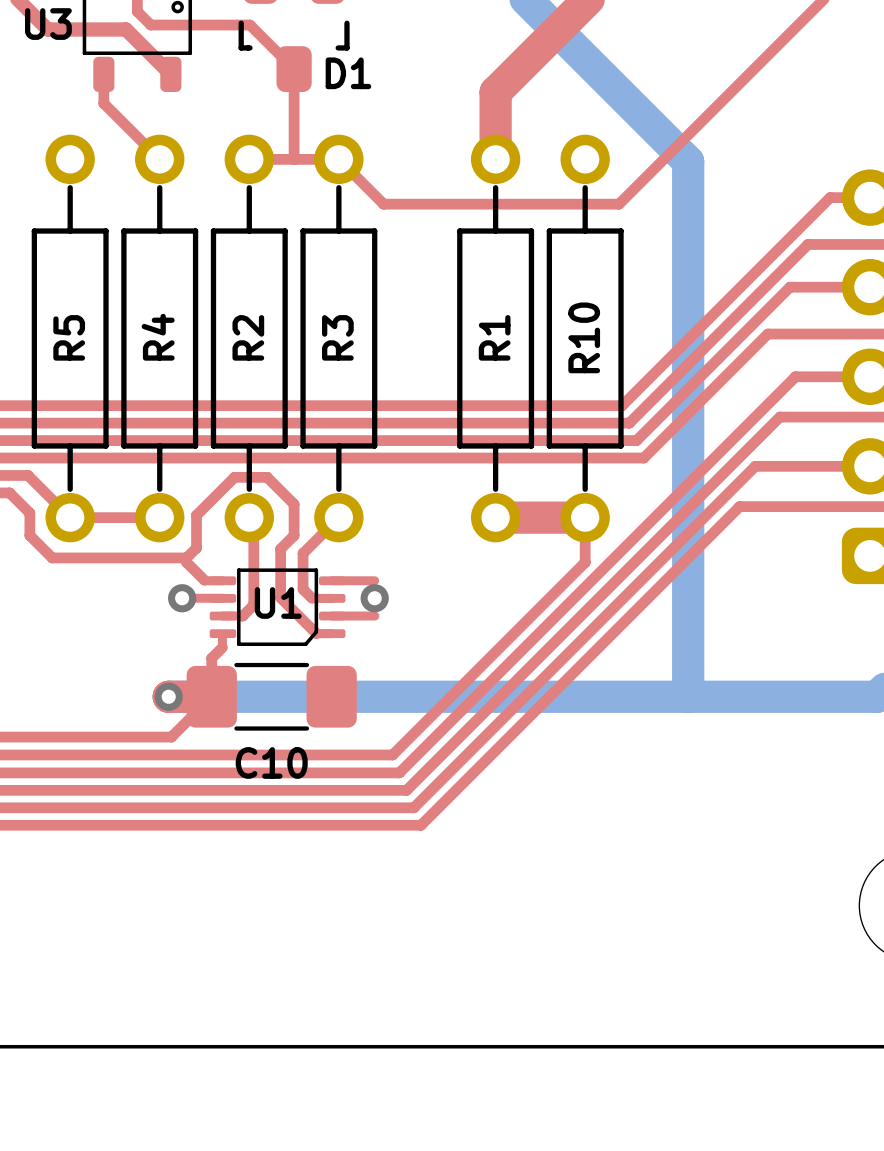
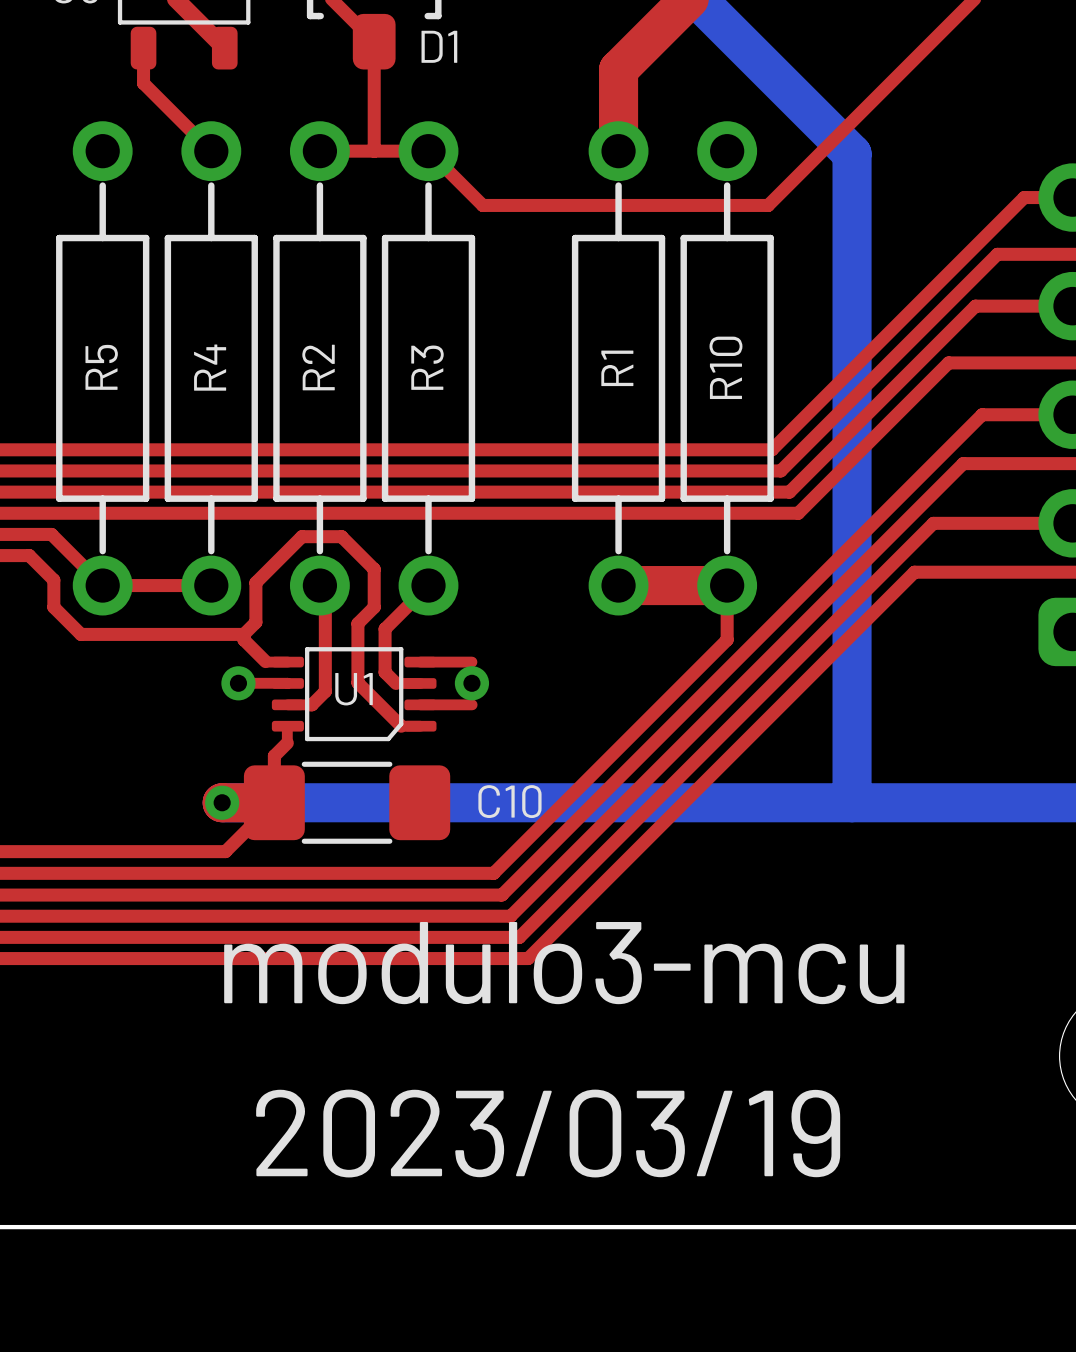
C10 name position: C10 (271, 762) -> C10 (509, 801)
text: none -> modulo3-mcu (564, 963)
text: none -> 2023/03/19 (548, 1133)

